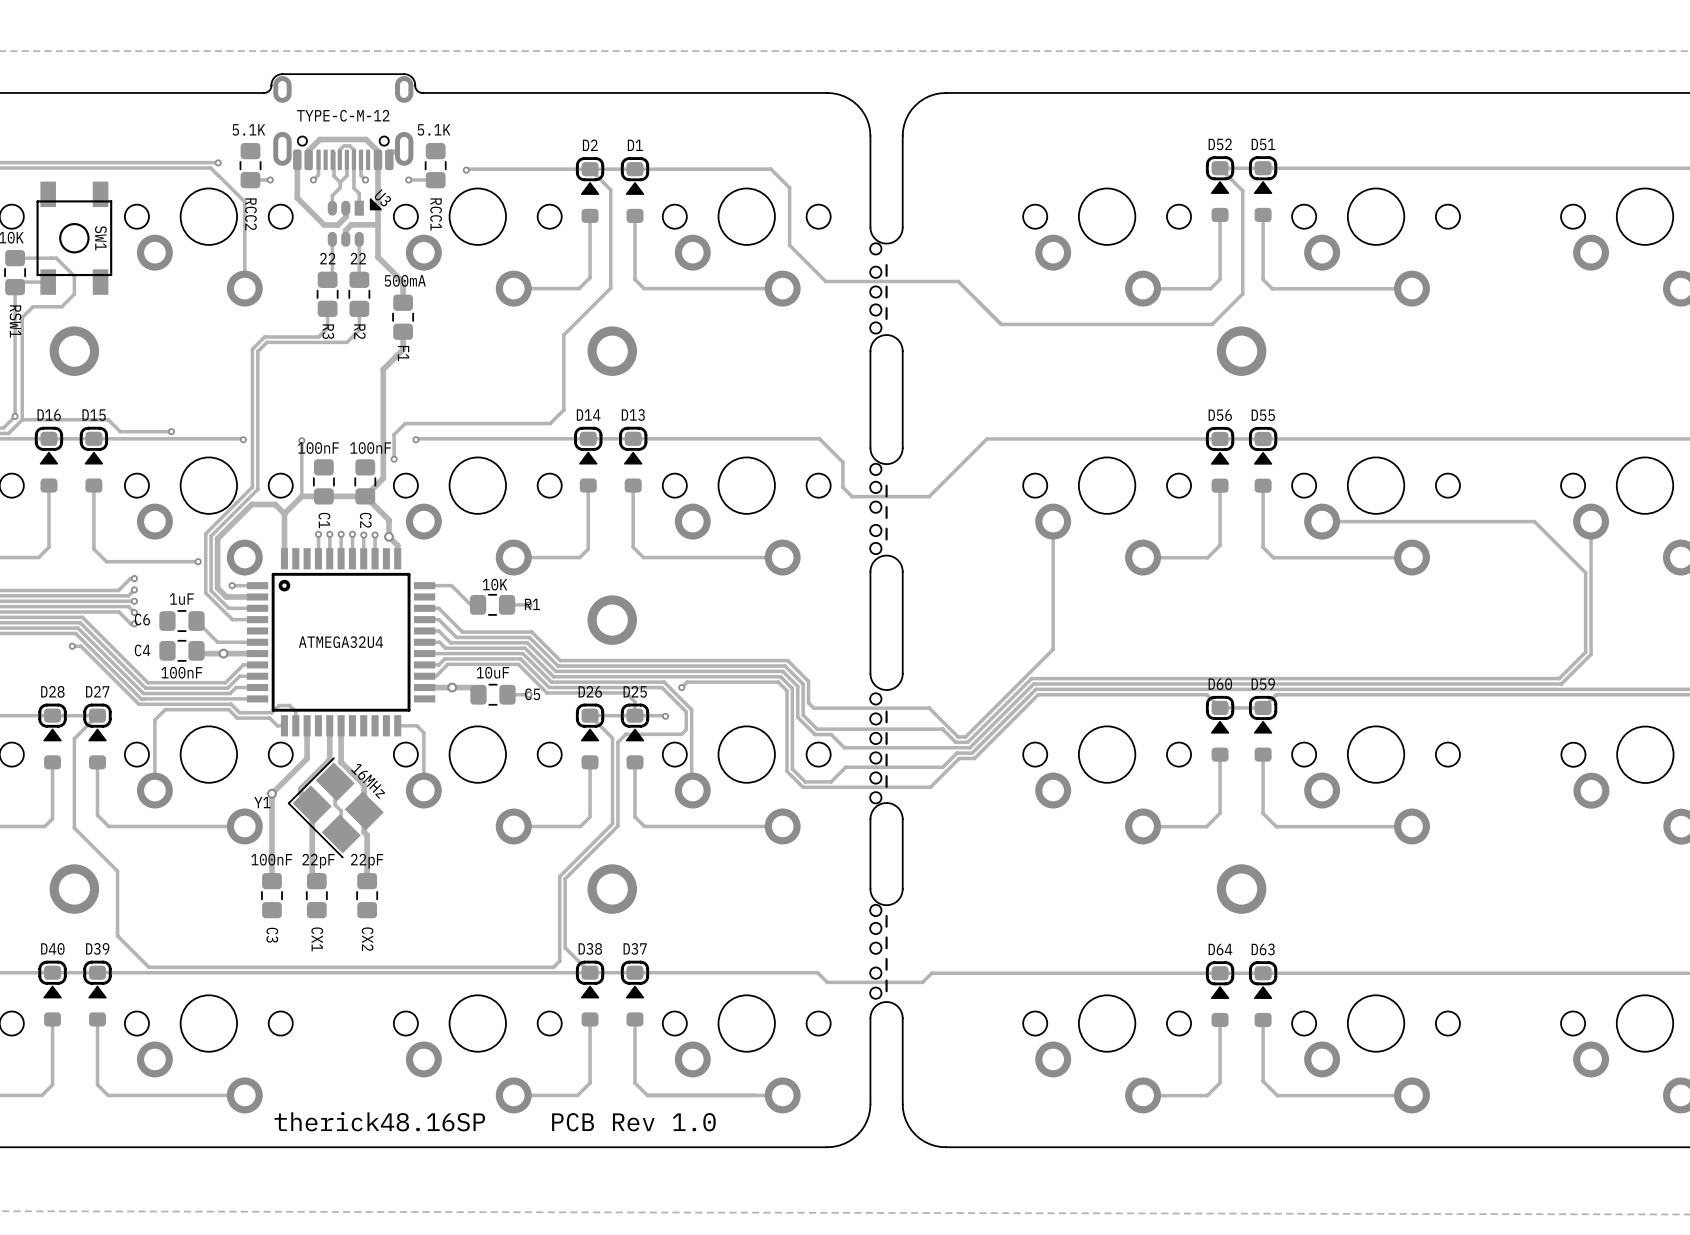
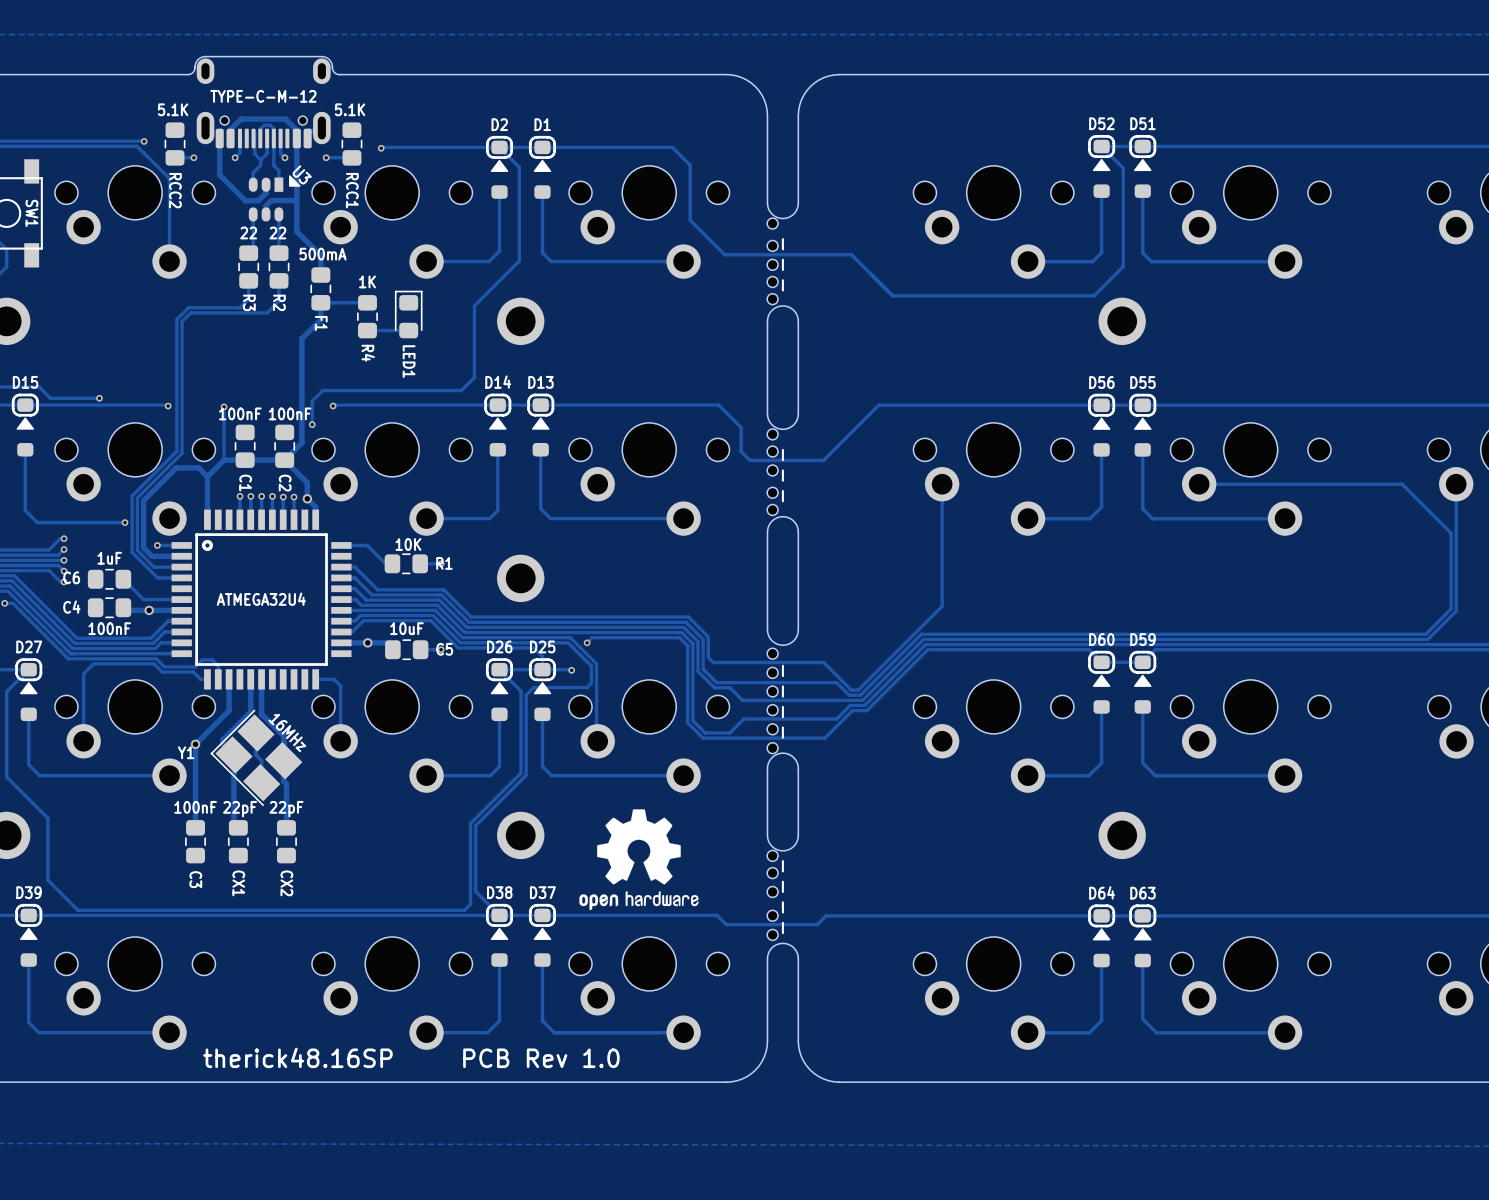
track: none -> (367, 302) (320, 302)
LED1: none -> (408, 314)
R4: none -> 1K (367, 316)
track: none -> (408, 330) (367, 330)
drawing: none -> [579, 809, 699, 911]

